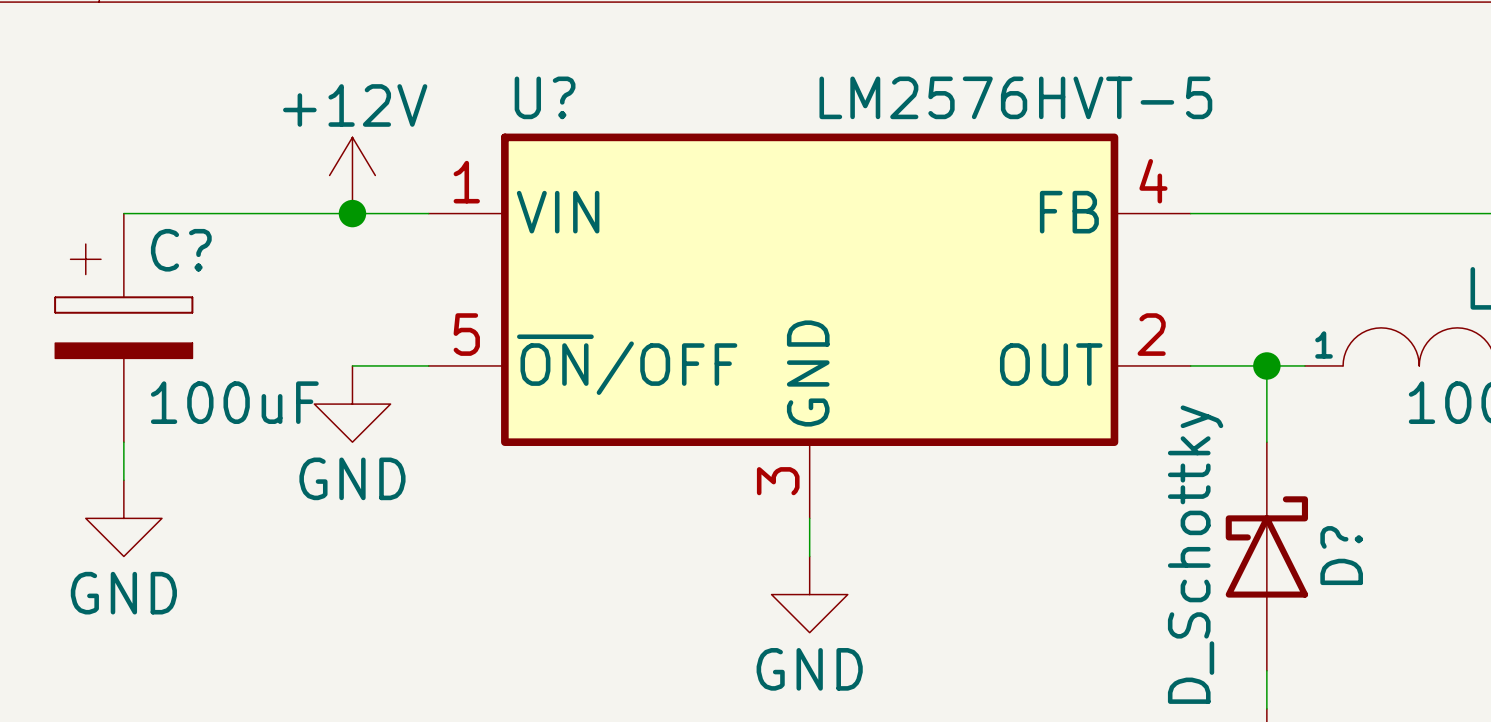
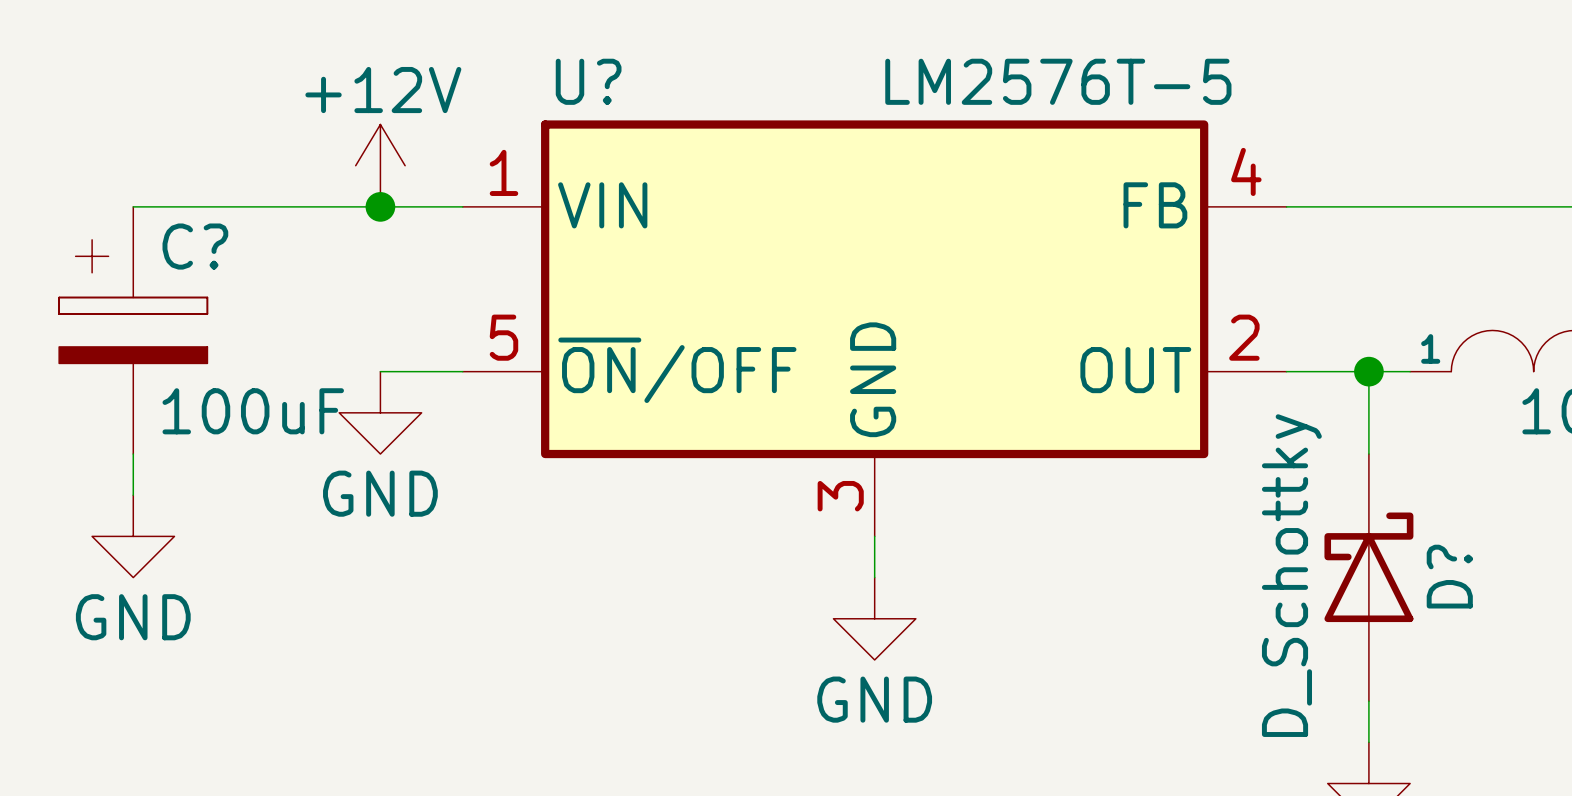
U? value: LM2576HVT-5 (1015, 97) -> LM2576T-5 (1058, 81)

